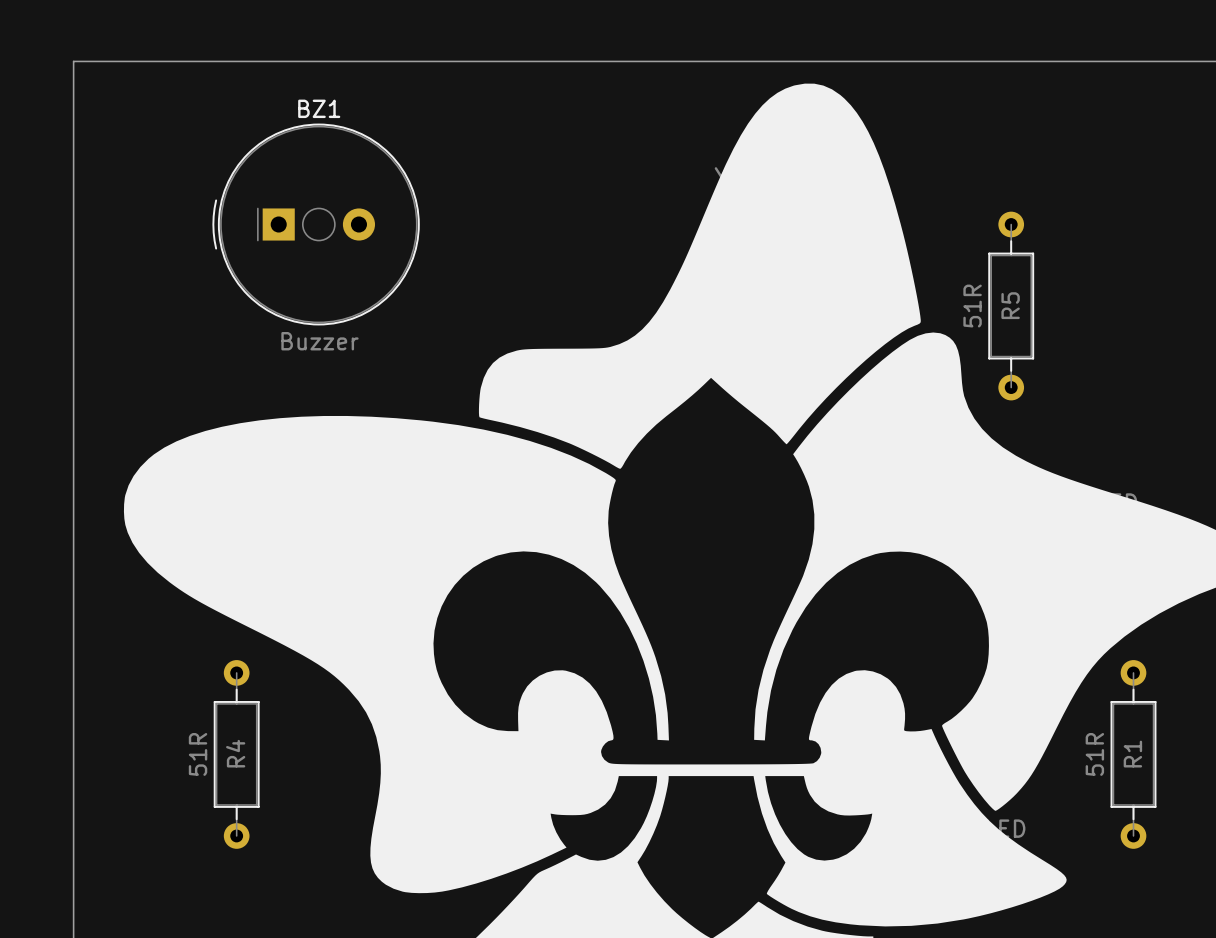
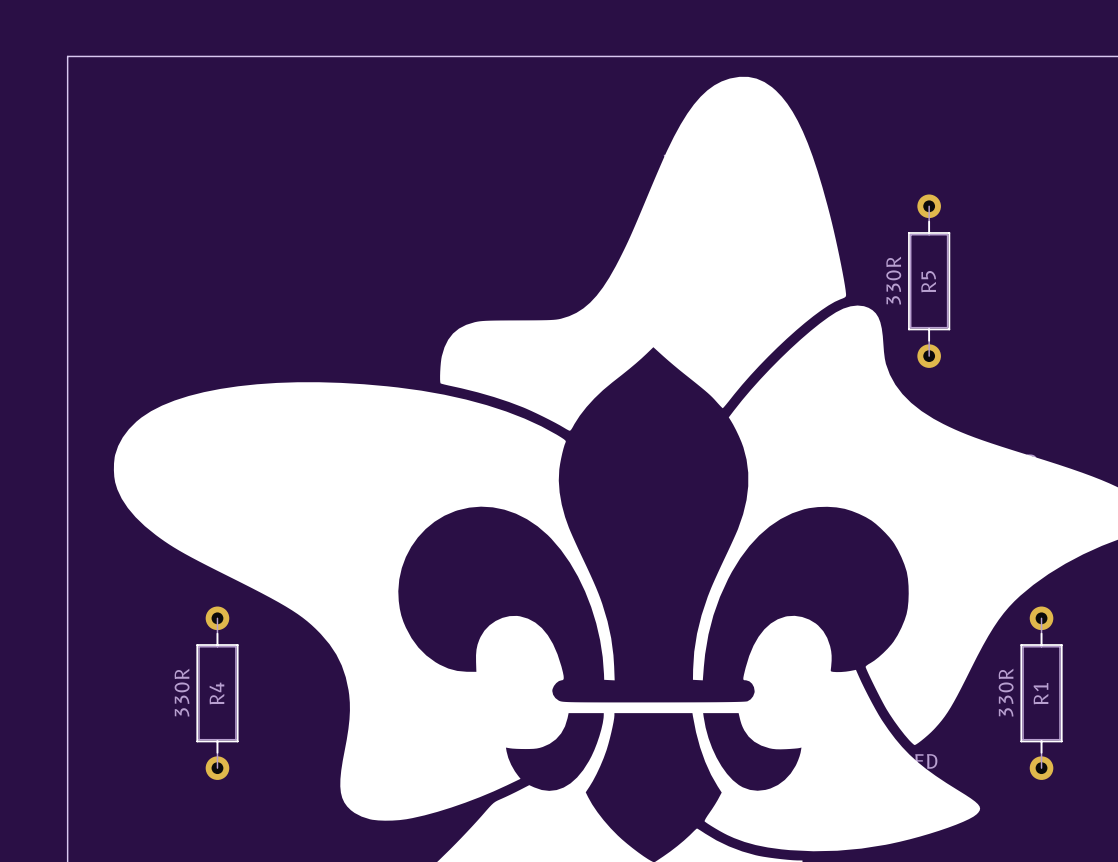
BZ1: Buzzer (316, 224) -> none
R5 value: 51R (972, 306) -> 330R (893, 280)
R4 value: 51R (198, 754) -> 330R (182, 692)
R1 value: 51R (1094, 754) -> 330R (1006, 692)

